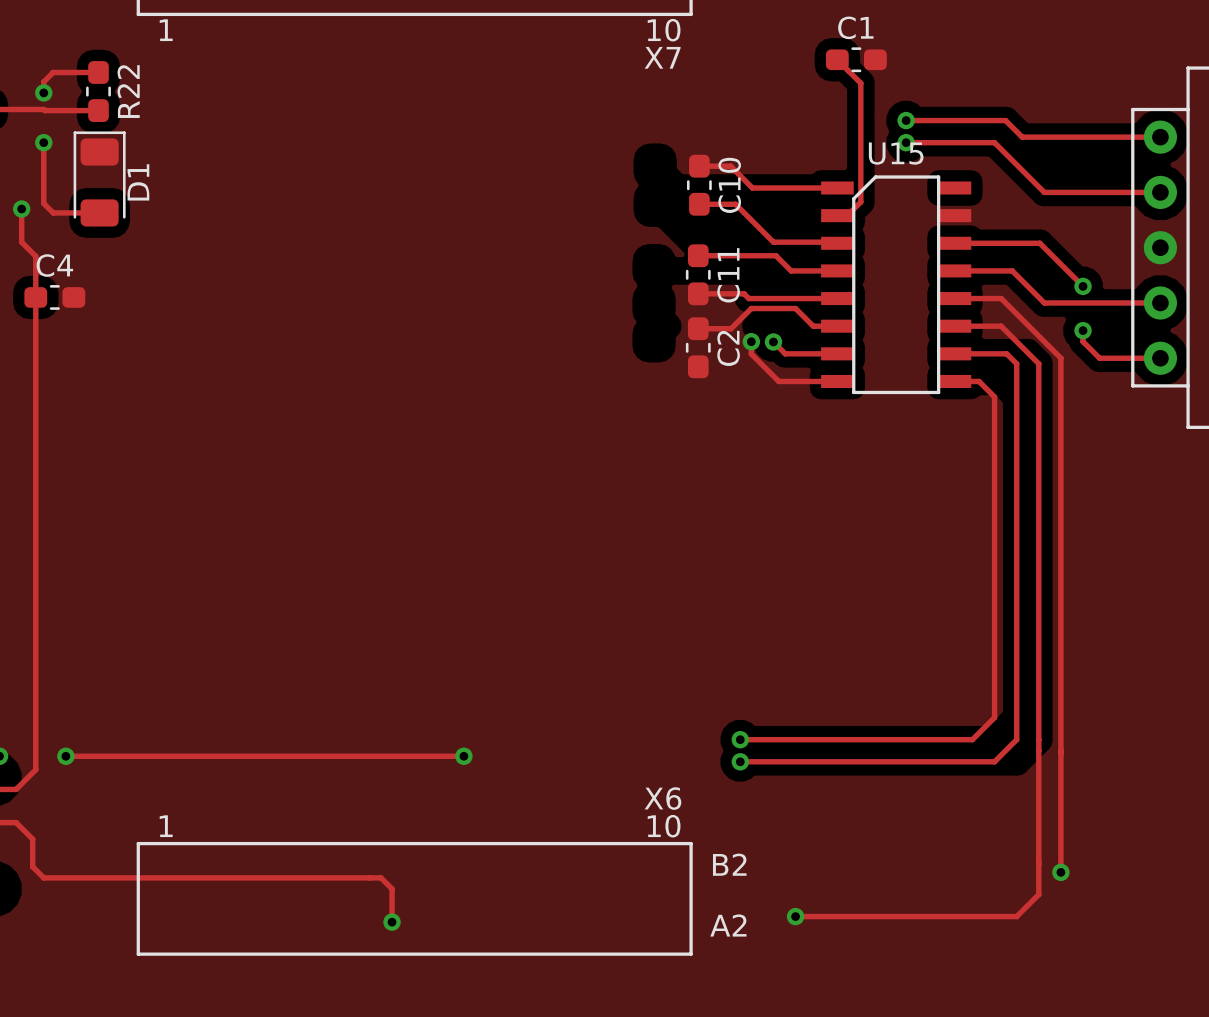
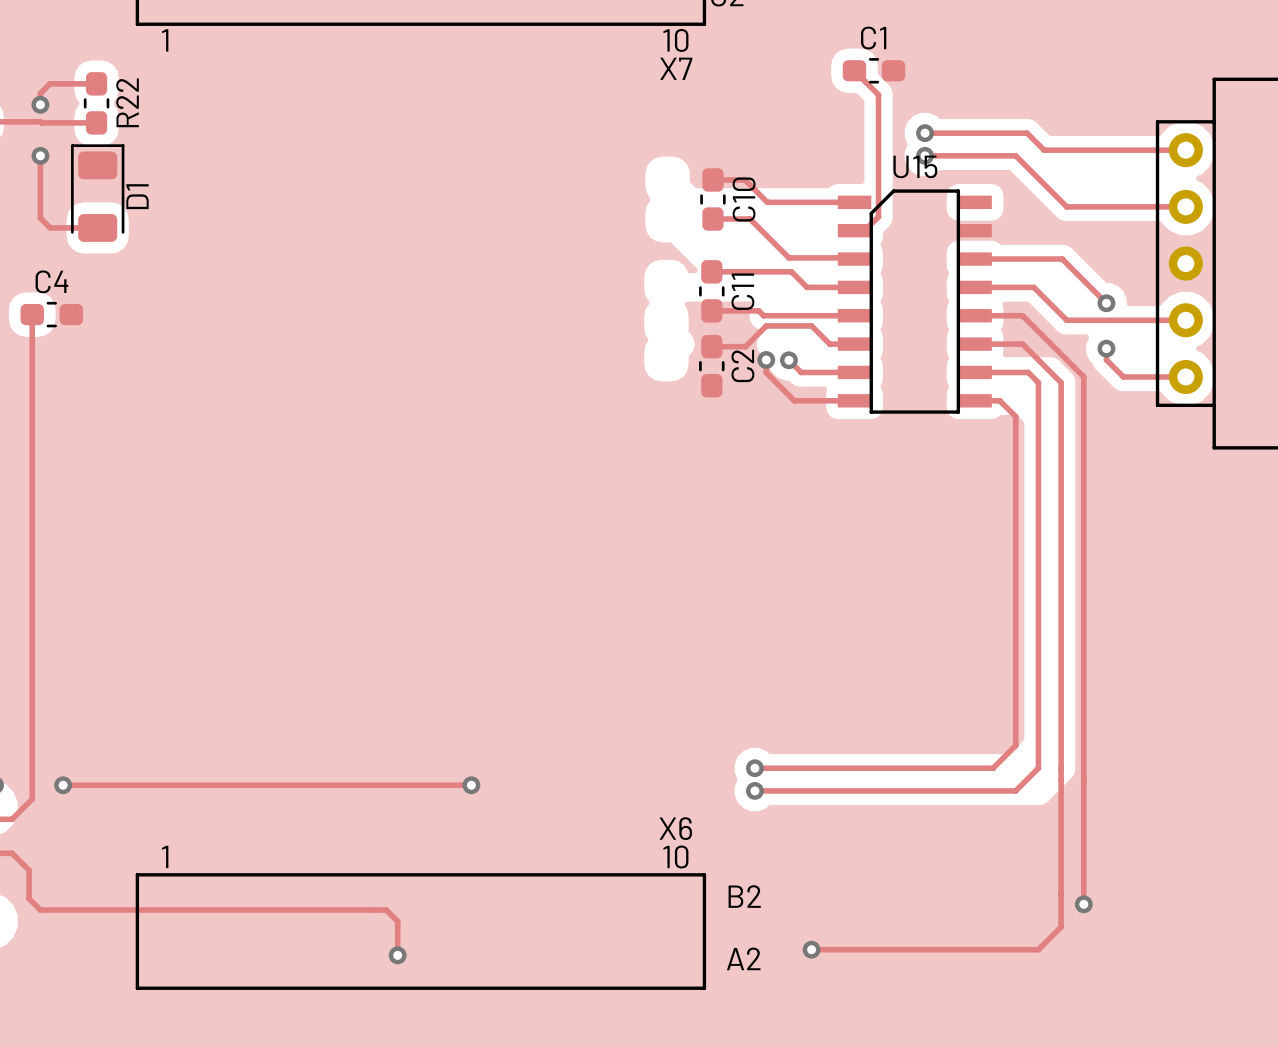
track: (21, 209) (21, 242) (35, 256) (35, 297) -> none
via: (21, 209) -> none

